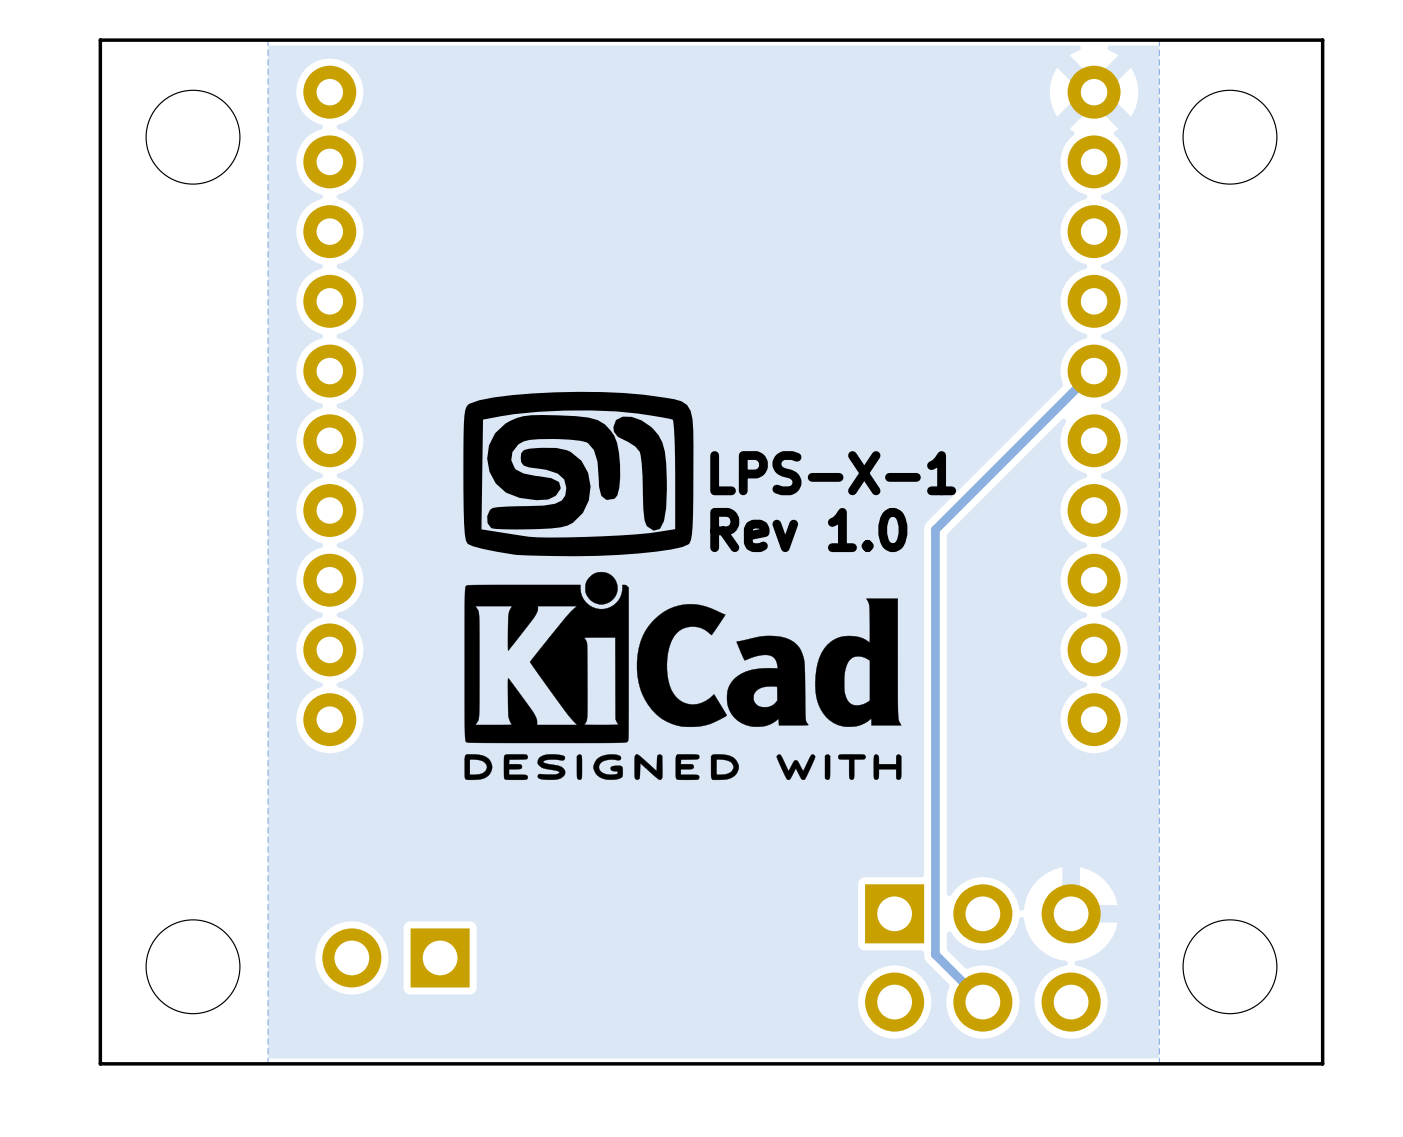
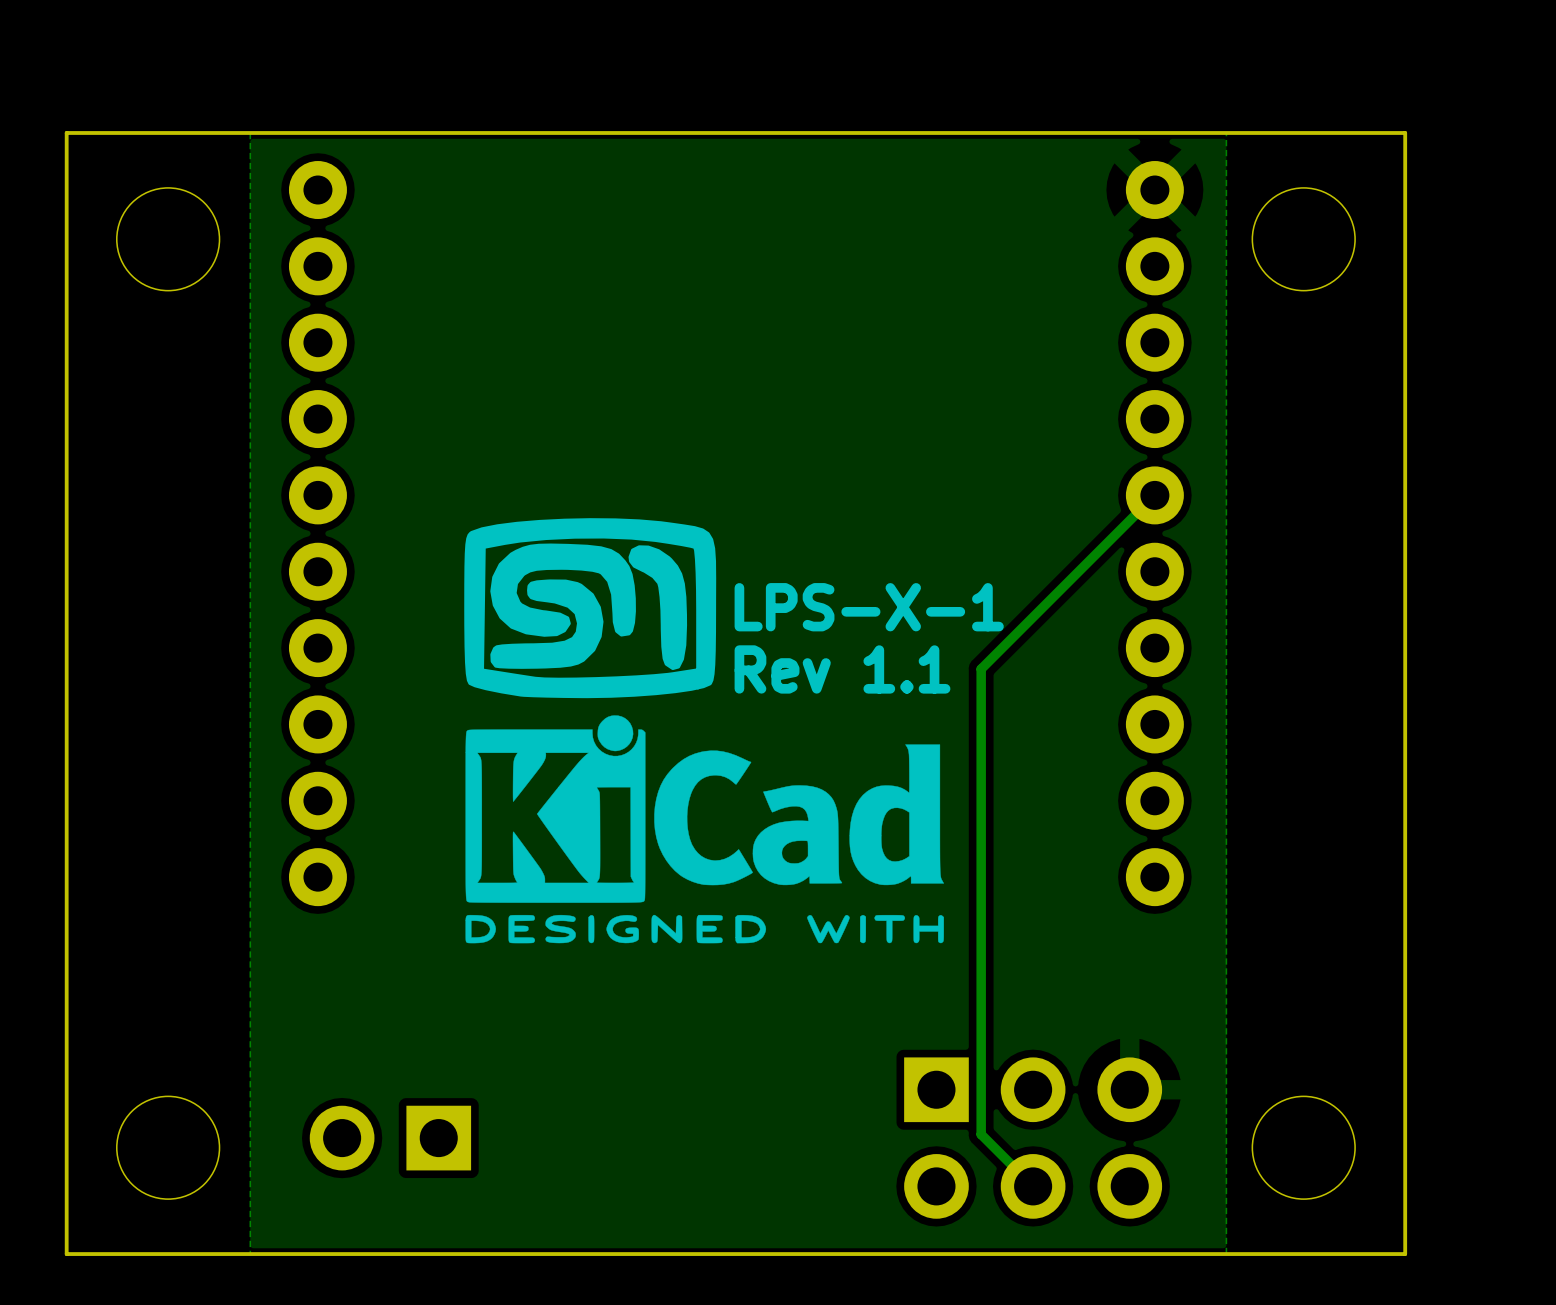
text: Rev 1.0 (808, 530) -> Rev 1.1 (842, 669)

